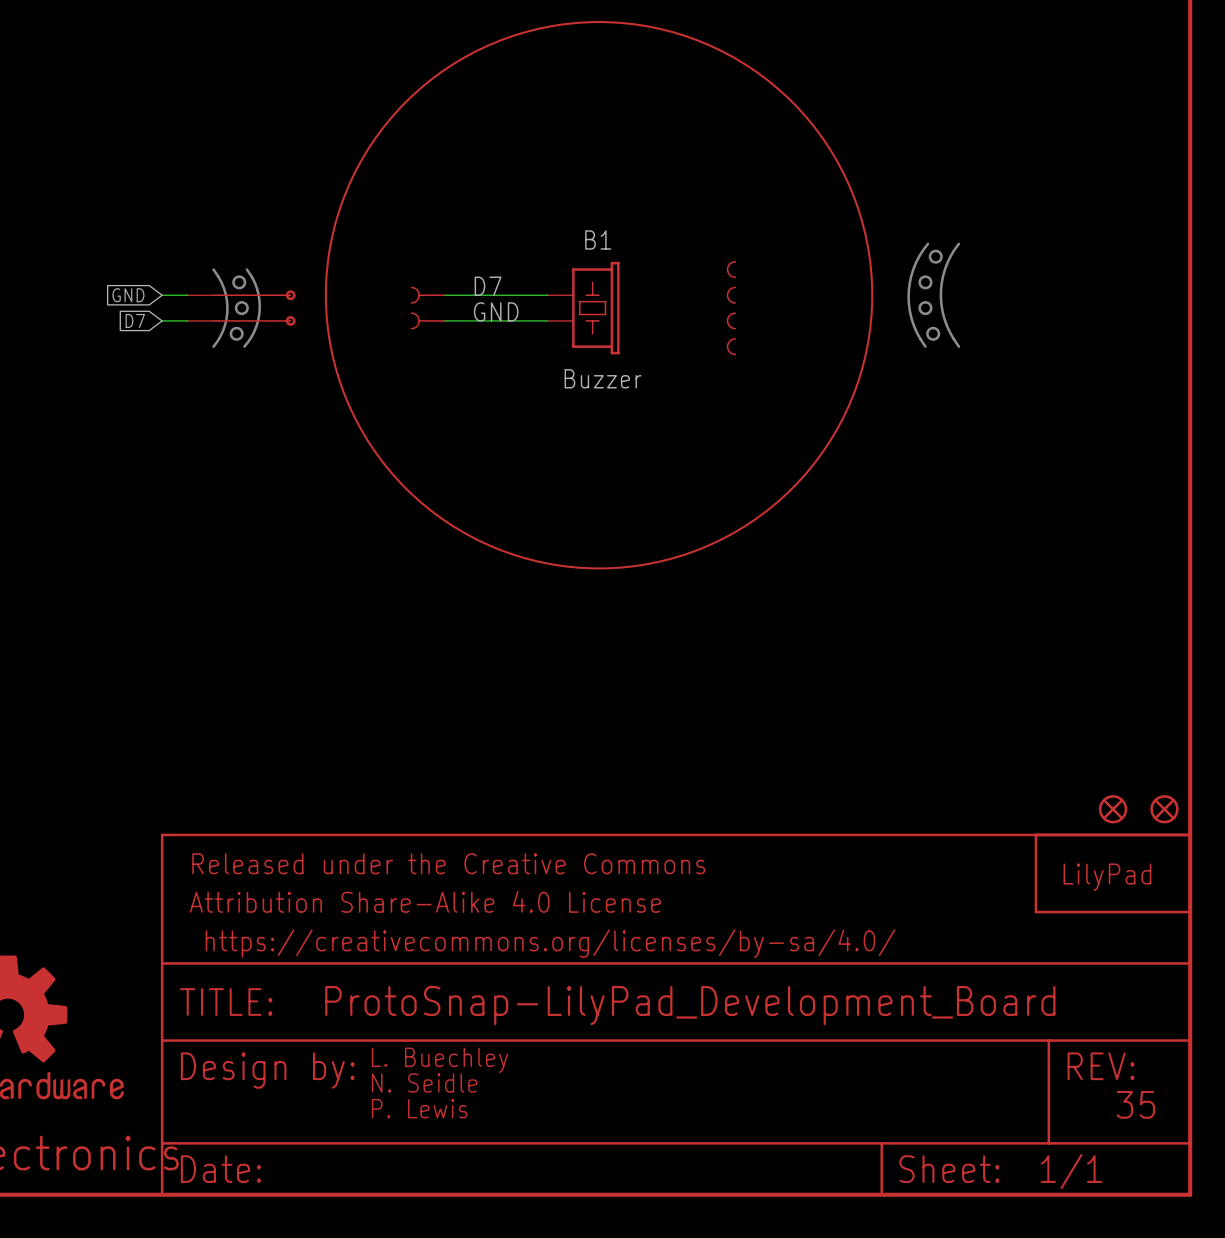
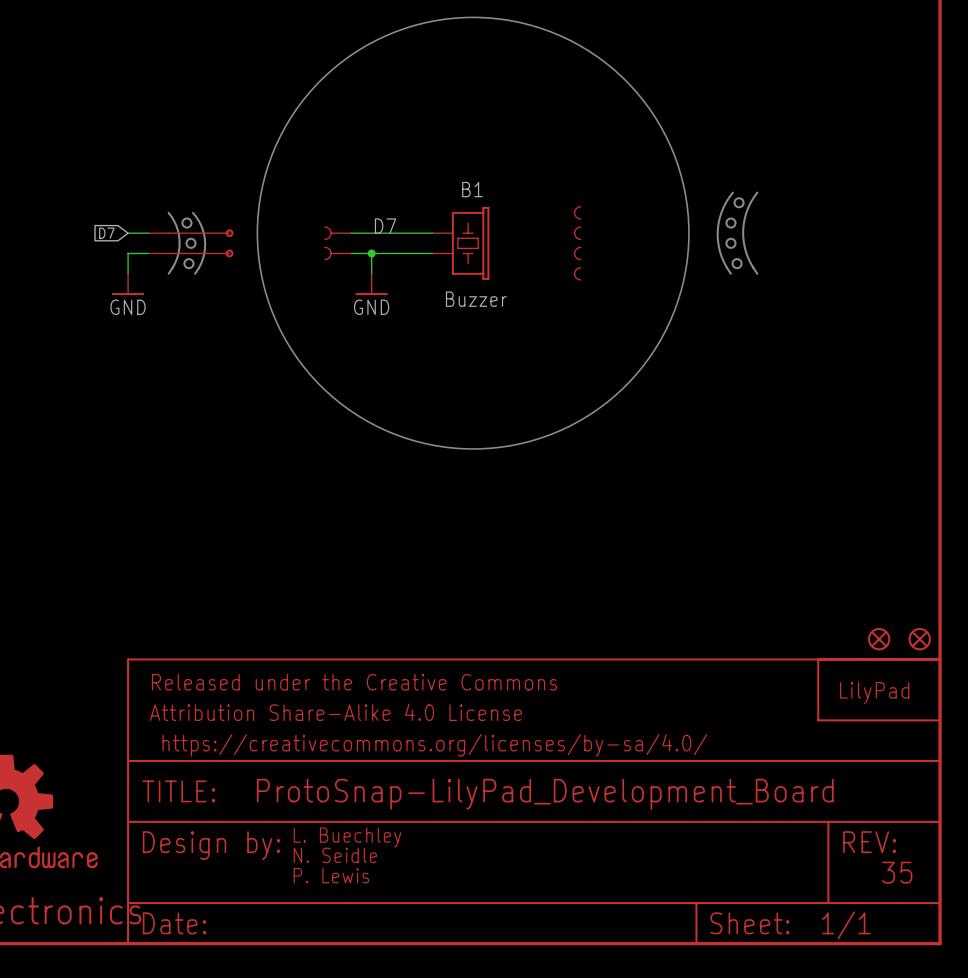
drawing shape: [324, 21, 874, 570] -> [256, 16, 690, 450]
global label: GND (128, 295) -> D7 (106, 233)
part flip: as is (253, 308) -> up-down (200, 243)
label: GND (496, 311) -> none
global label: D7 (135, 320) -> none
wire: none -> (128, 253) (128, 273)
wire: none -> (371, 253) (371, 273)
junction: none -> (371, 253)
power symbol: none -> GND (128, 284)
power symbol: none -> GND (371, 284)

